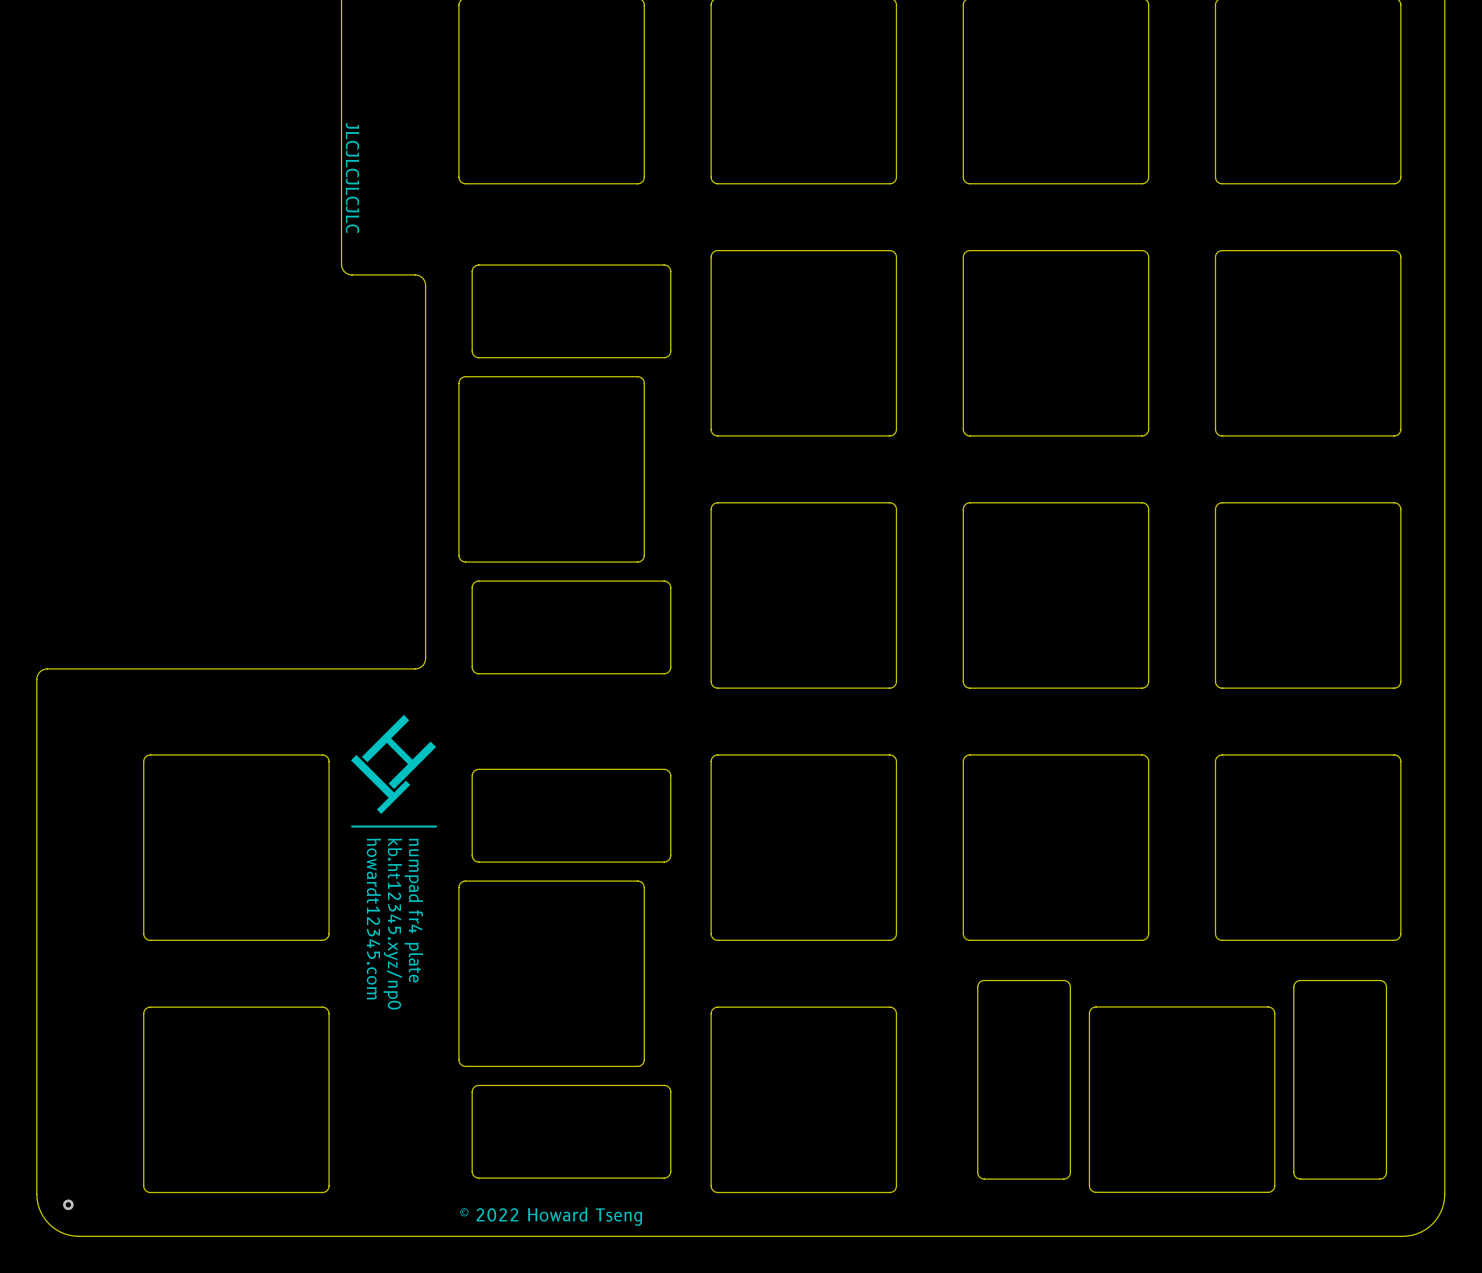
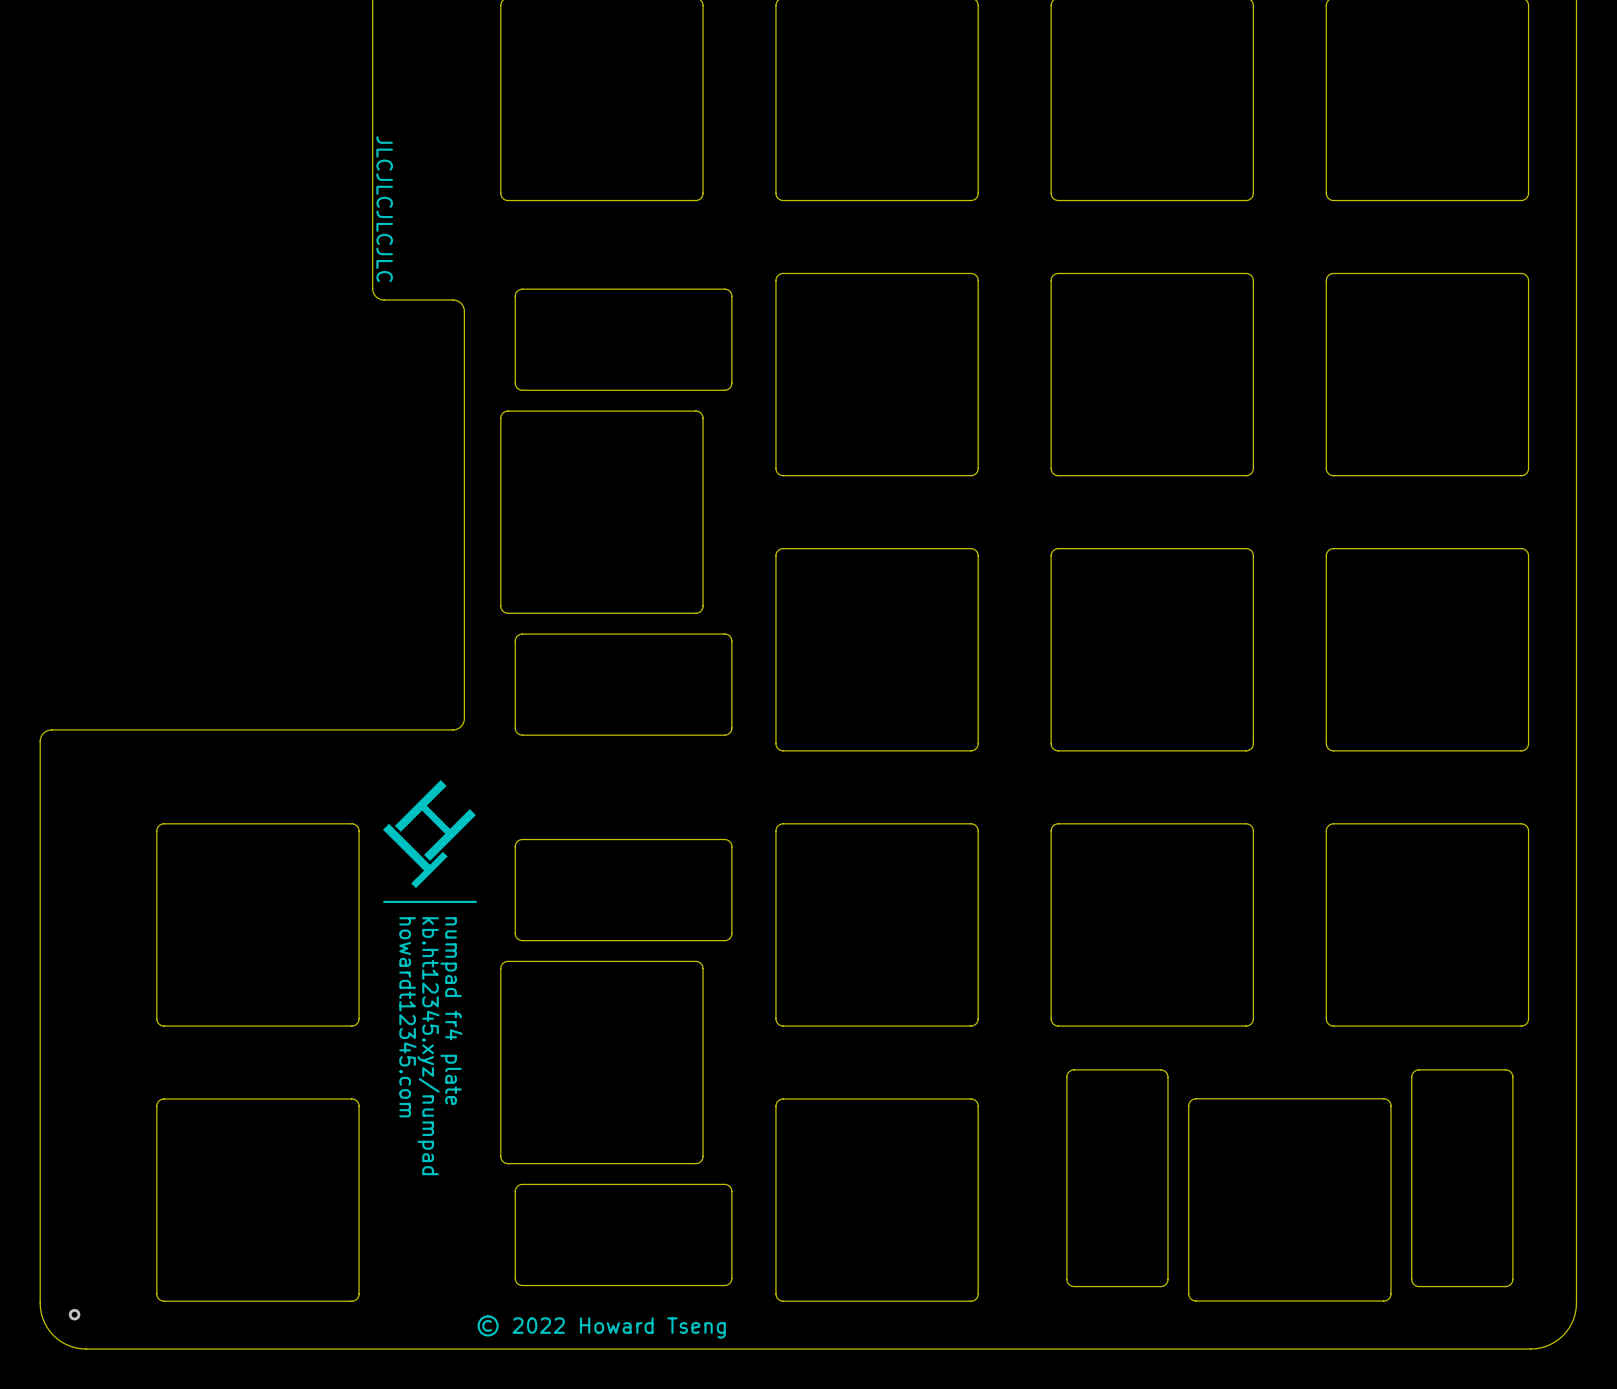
text: kb.ht12345.xyz/np0 (392, 924) -> kb.ht12345.xyz/numpad (428, 1046)

